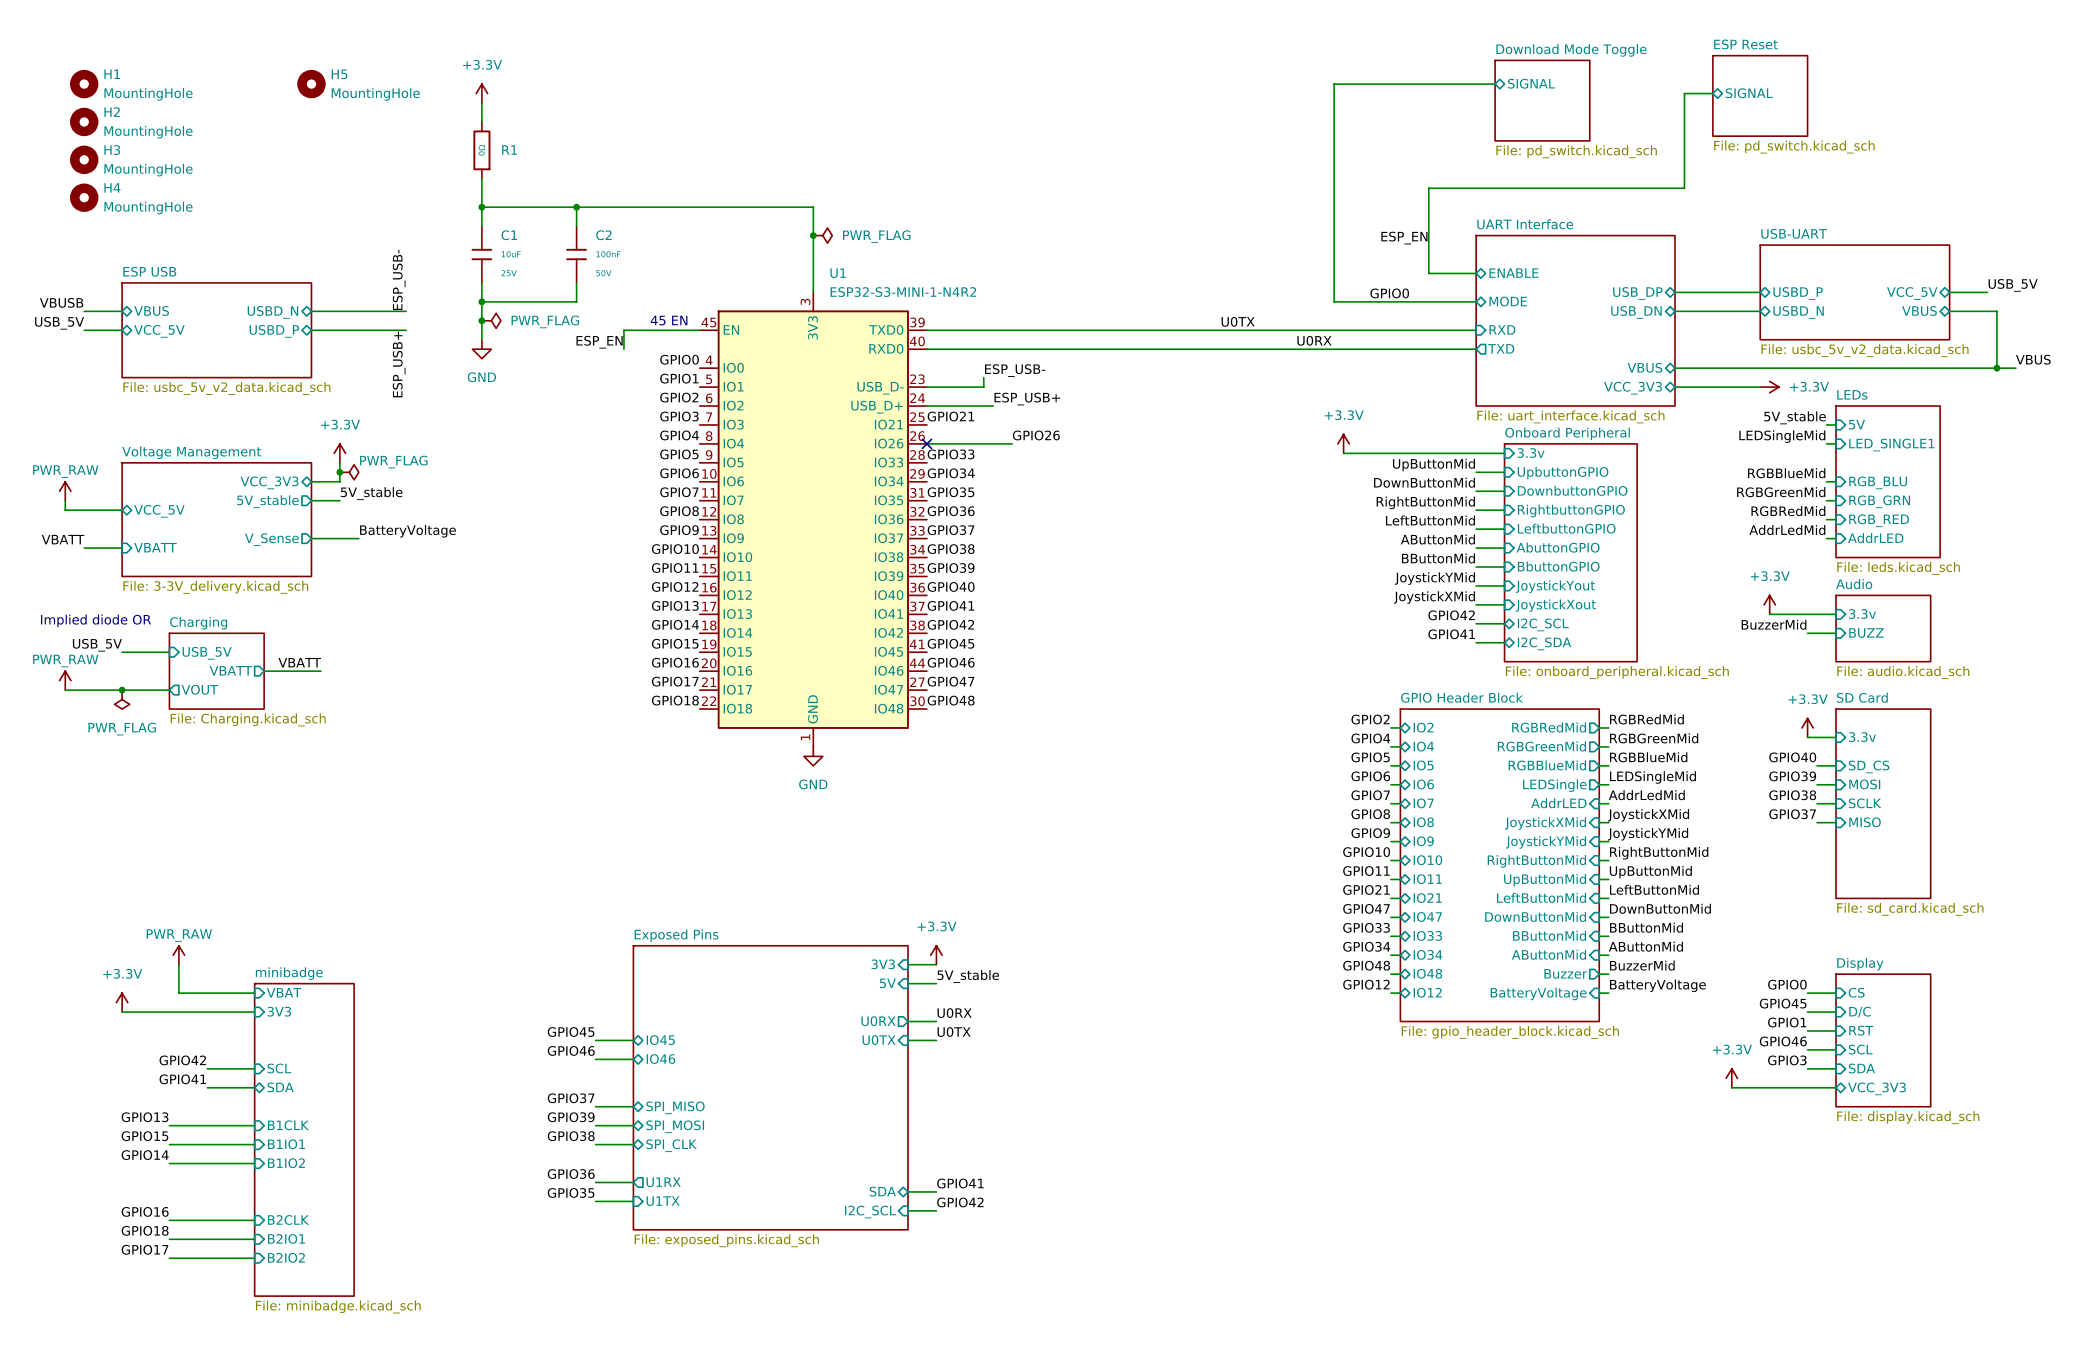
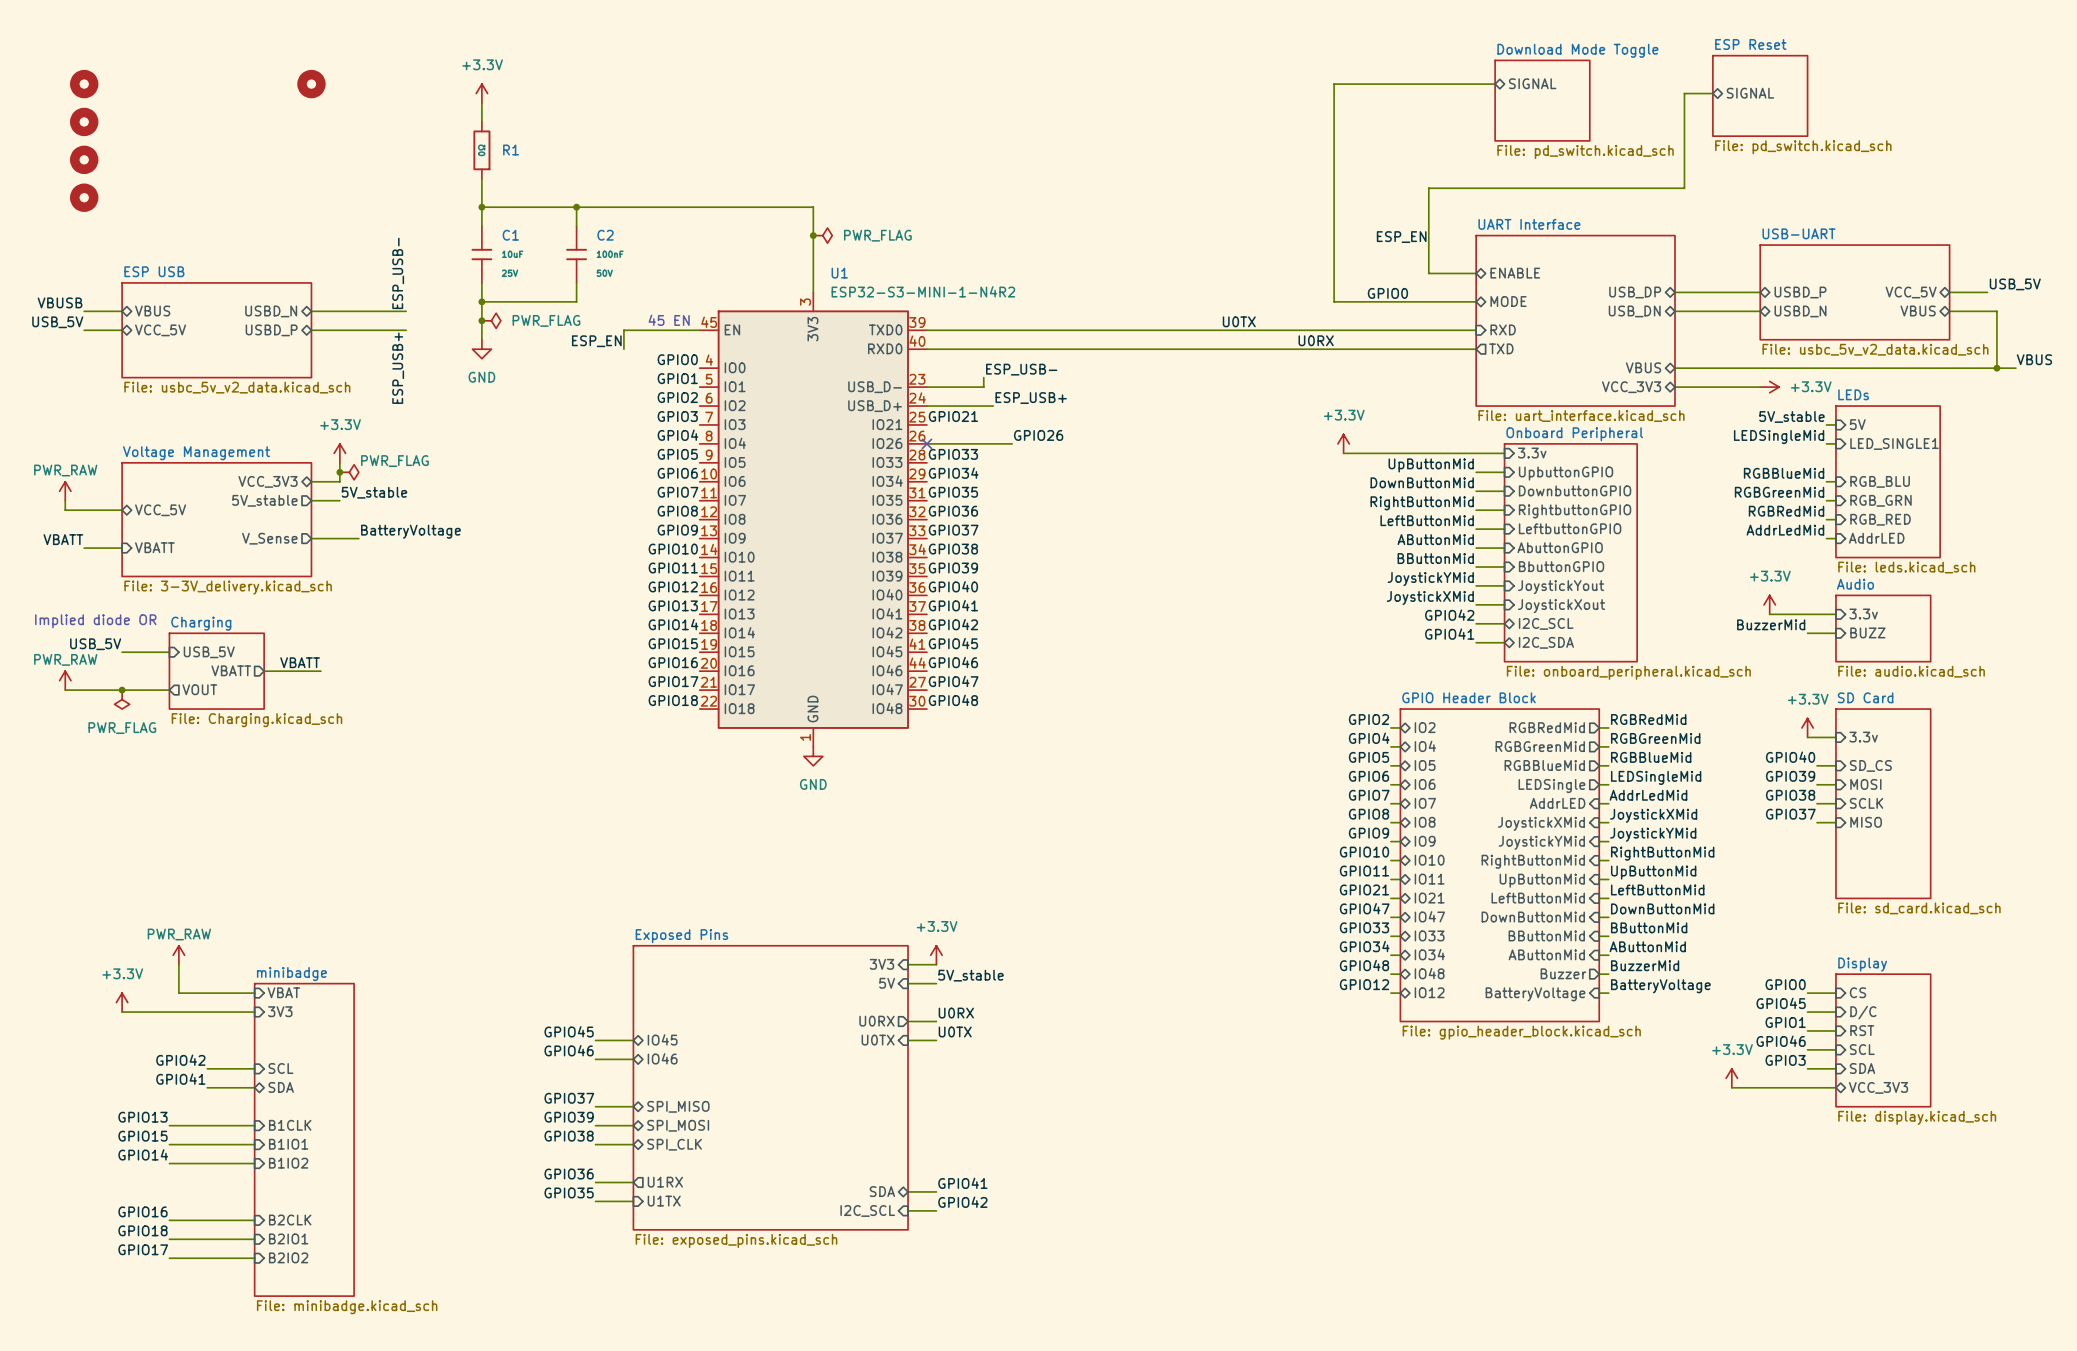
H1 name: H1 (112, 74) -> none
H5 name: H5 (339, 74) -> none
H1 value: MountingHole (148, 94) -> none
H5 value: MountingHole (375, 94) -> none
H2 name: H2 (112, 112) -> none
H2 value: MountingHole (148, 132) -> none
H3 name: H3 (112, 150) -> none
H3 value: MountingHole (148, 170) -> none
H4 name: H4 (112, 187) -> none
H4 value: MountingHole (148, 207) -> none

